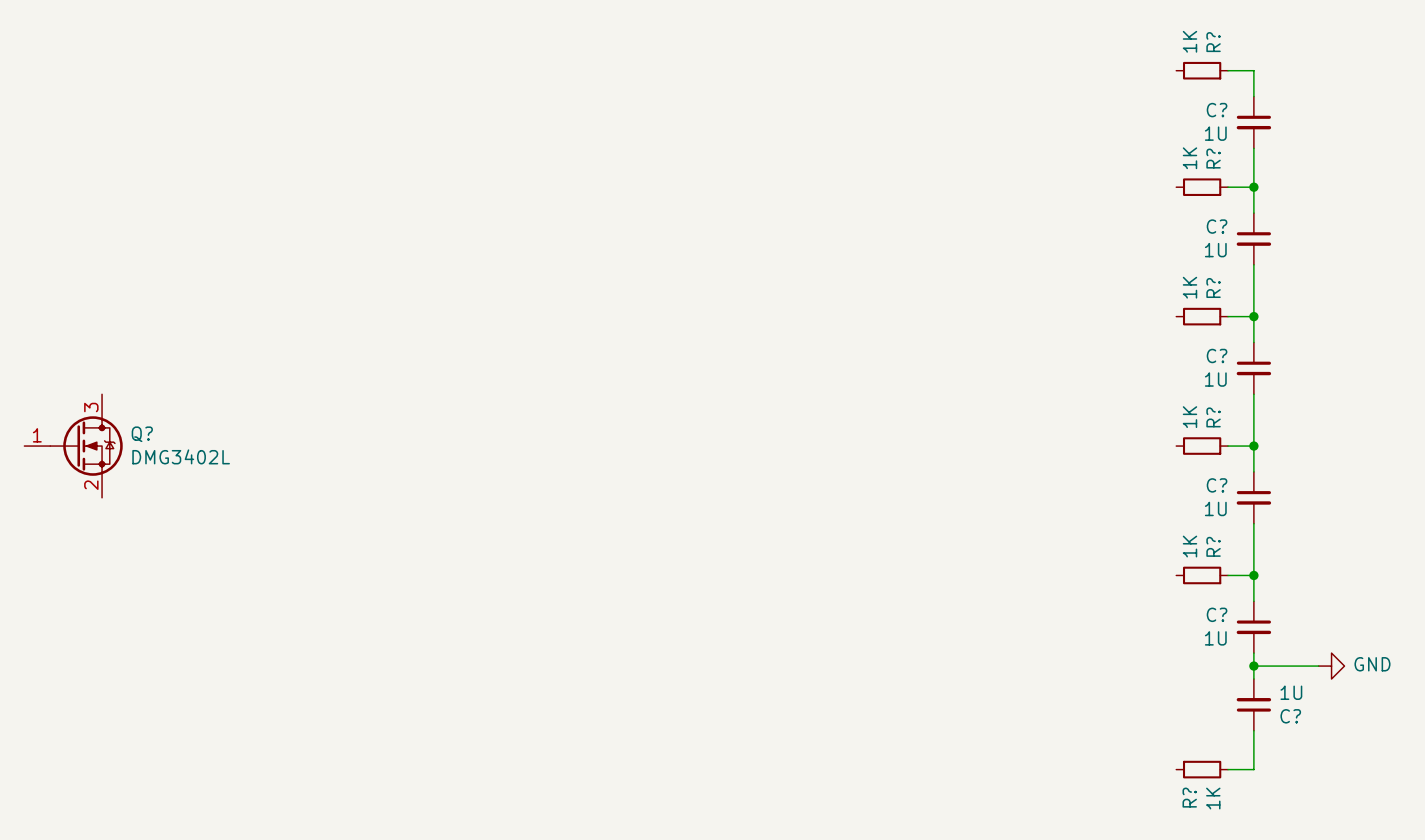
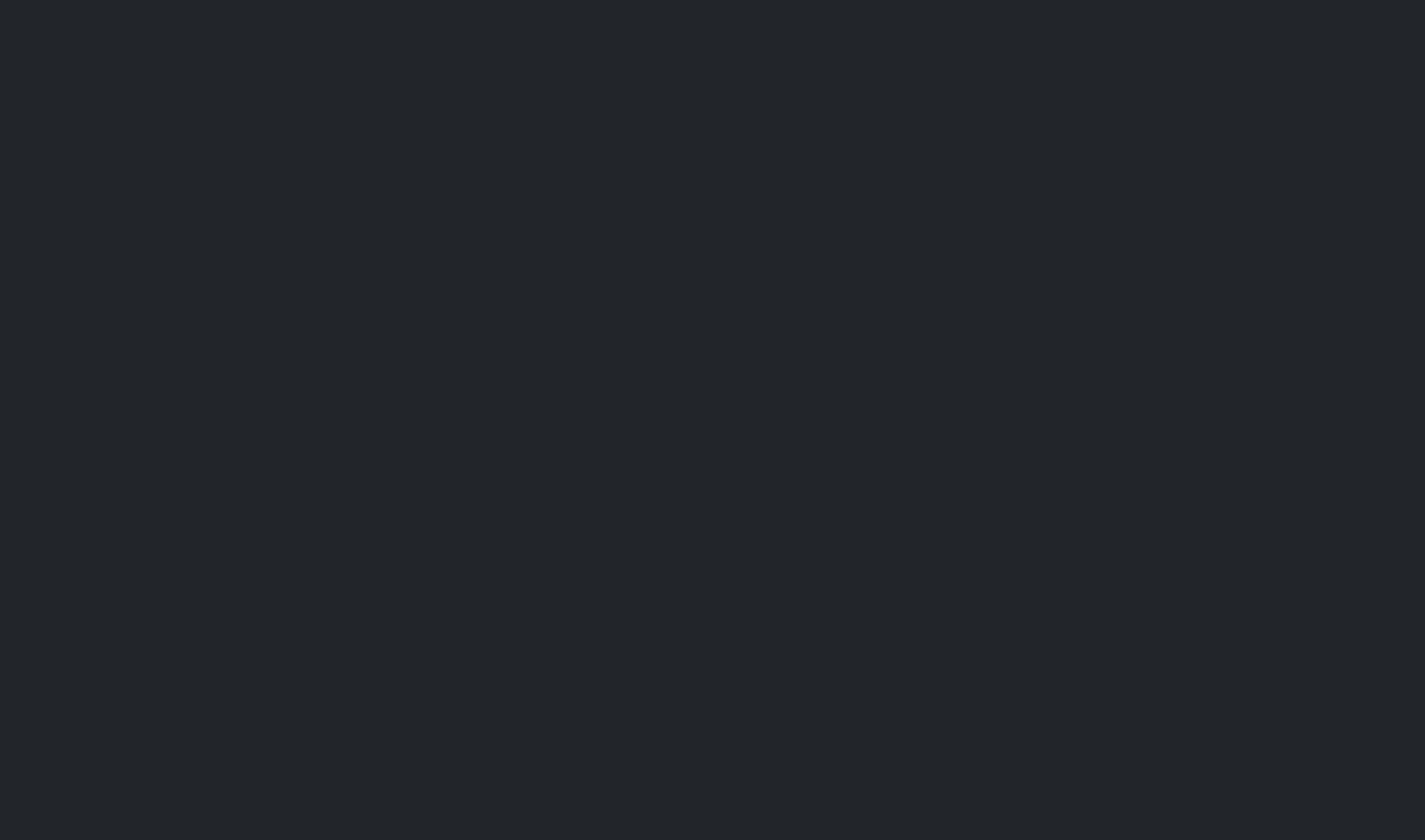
R?: 1K (1202, 70) -> none
wire: (1228, 70) (1253, 70) (1253, 96) -> none
C?: 1U (1253, 122) -> none
wire: (1253, 148) (1253, 213) -> none
R?: 1K (1202, 187) -> none
wire: (1228, 187) (1253, 187) -> none
junction: (1253, 187) -> none
C?: 1U (1253, 238) -> none
wire: (1253, 264) (1253, 342) -> none
R?: 1K (1202, 316) -> none
wire: (1228, 316) (1253, 316) -> none
junction: (1253, 316) -> none
C?: 1U (1253, 368) -> none
wire: (1253, 394) (1253, 471) -> none
Q?: DMG3402L (73, 446) -> none
R?: 1K (1202, 446) -> none
wire: (1228, 446) (1253, 446) -> none
junction: (1253, 446) -> none
C?: 1U (1253, 497) -> none
wire: (1253, 523) (1253, 601) -> none
R?: 1K (1202, 575) -> none
wire: (1228, 575) (1253, 575) -> none
junction: (1253, 575) -> none
C?: 1U (1253, 627) -> none
wire: (1253, 653) (1253, 679) -> none
wire: (1253, 666) (1318, 666) -> none
junction: (1253, 666) -> none
power symbol: GND (1331, 666) -> none
C?: 1U (1253, 704) -> none
wire: (1253, 730) (1253, 769) (1228, 769) -> none
R?: 1K (1202, 769) -> none

